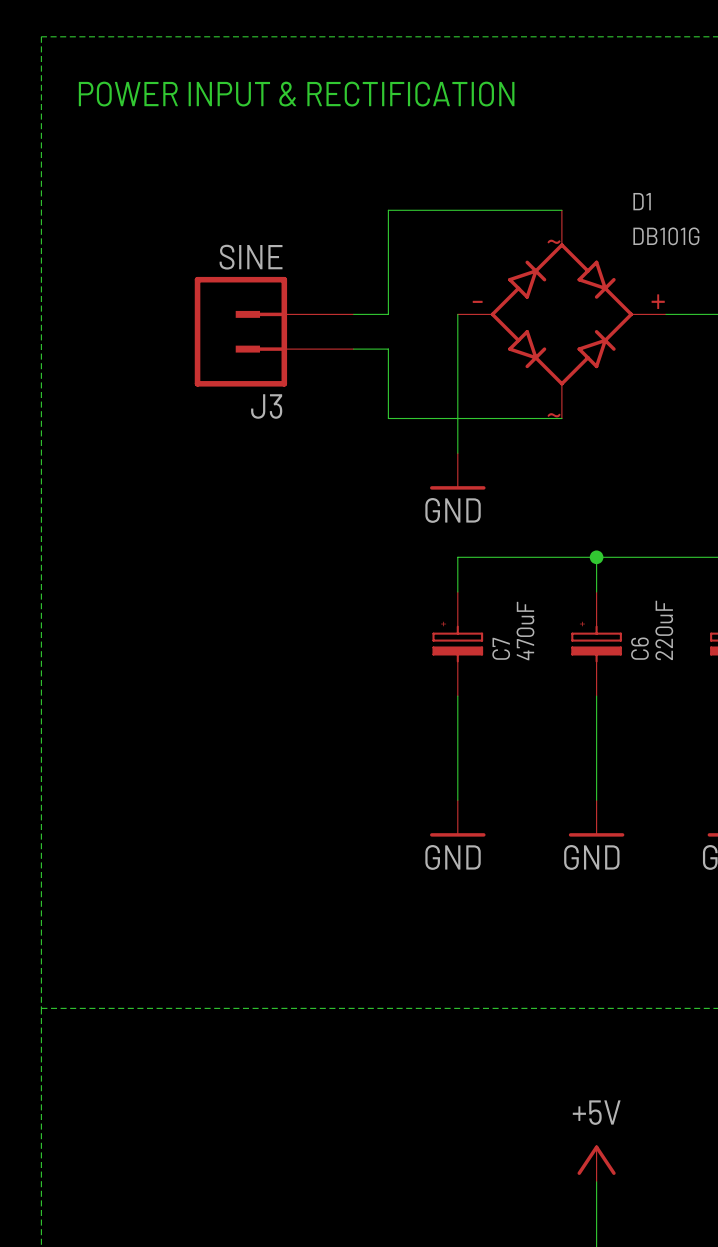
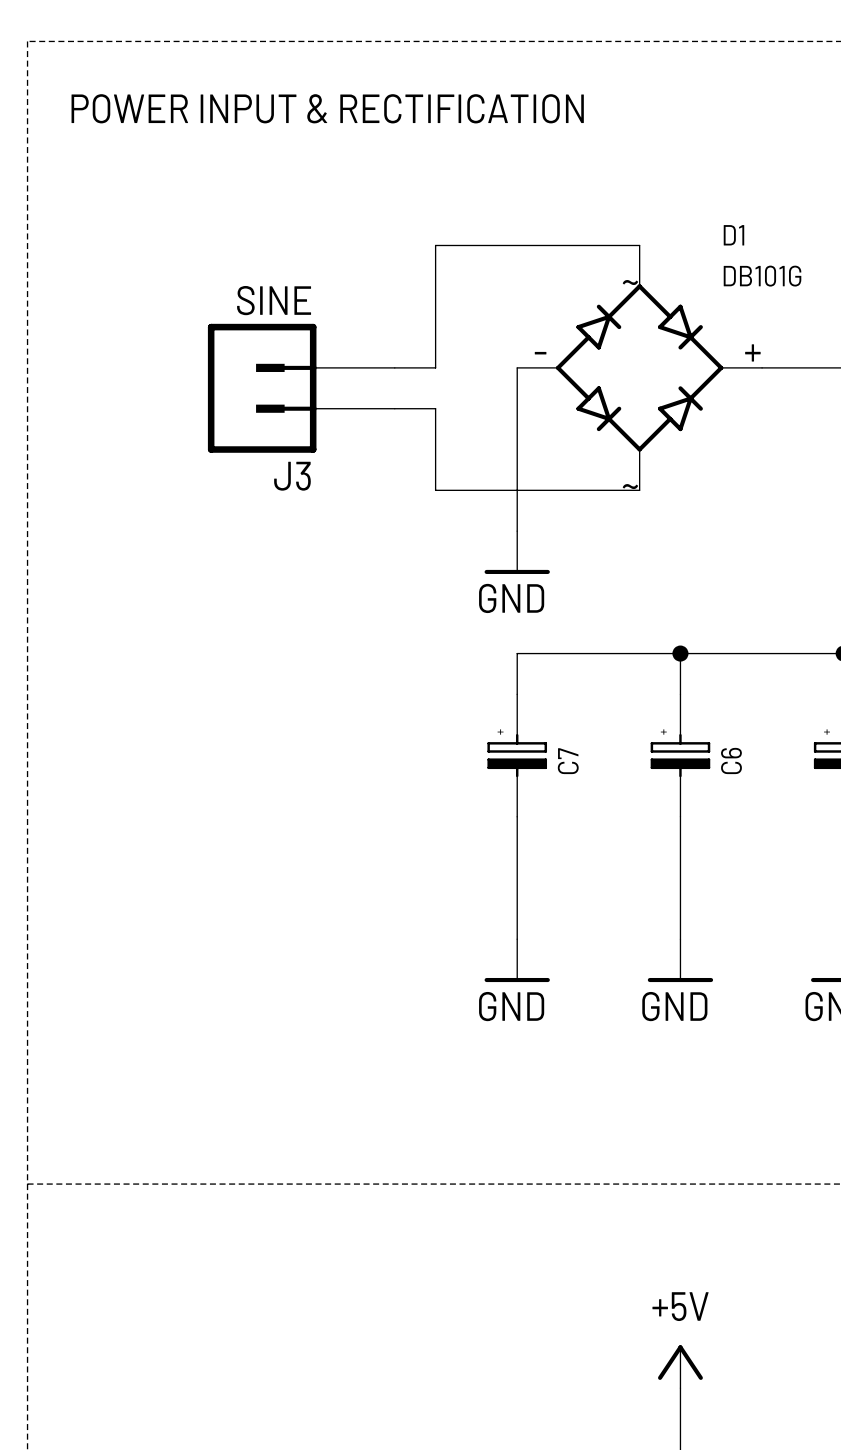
C6 value: 220uF (664, 630) -> none
C7 value: 470uF (525, 631) -> none

